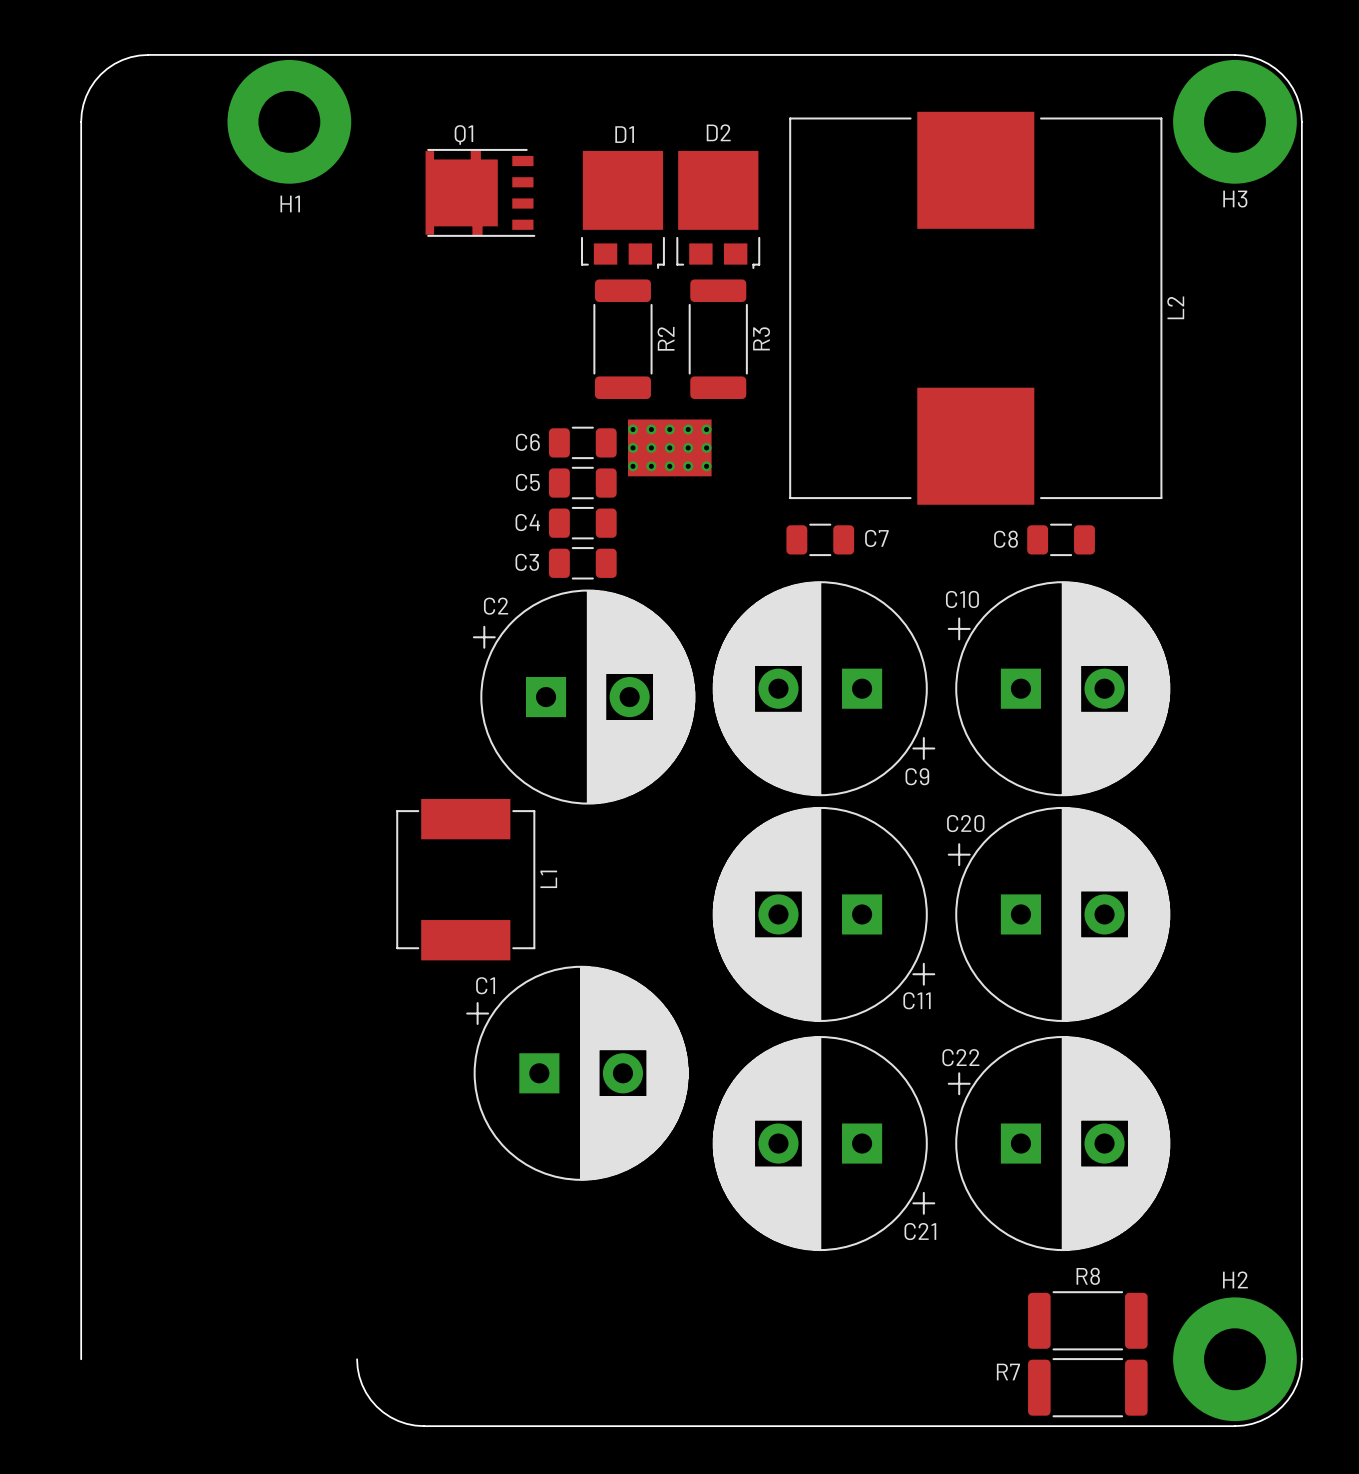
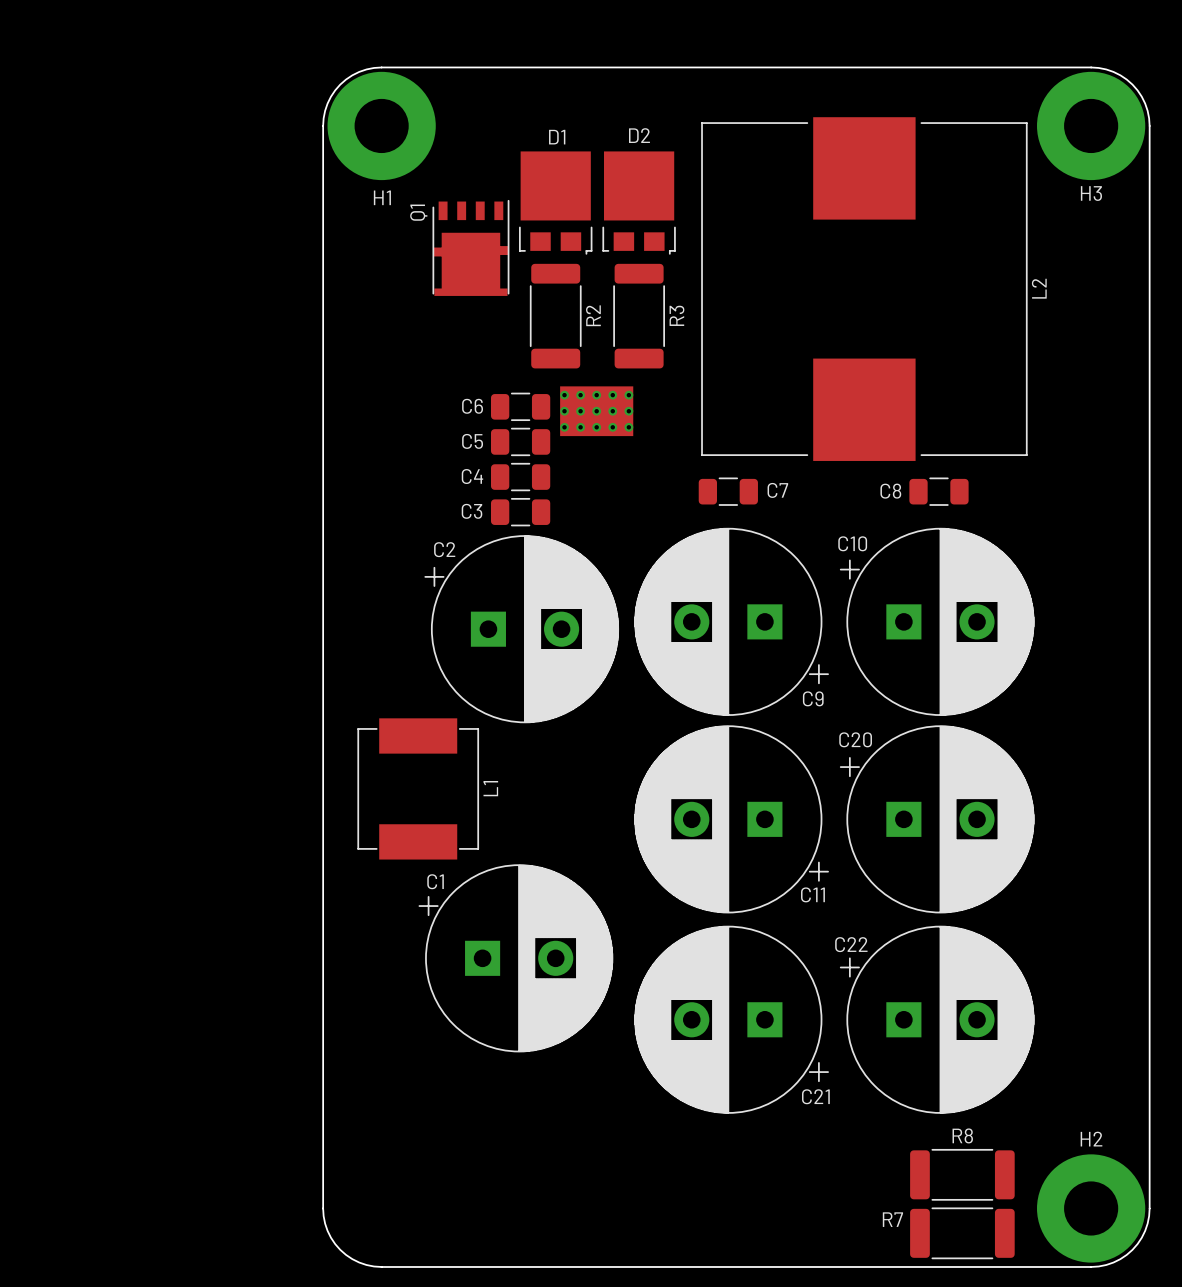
board edge: (423, 54) (139, 55) (114, 63) (100, 74) (90, 88) (83, 104) (81, 121) (81, 1359) -> (381, 67) (359, 71) (340, 84) (327, 103) (323, 125) (323, 1208)
H1 position: (289, 121) -> (381, 125)
Q1 name position: Q1 (463, 134) -> Q1 (418, 212)
Q1 rotation: 0° (480, 192) -> 90° counterclockwise (470, 247)
Q1 position: (480, 192) -> (470, 247)

